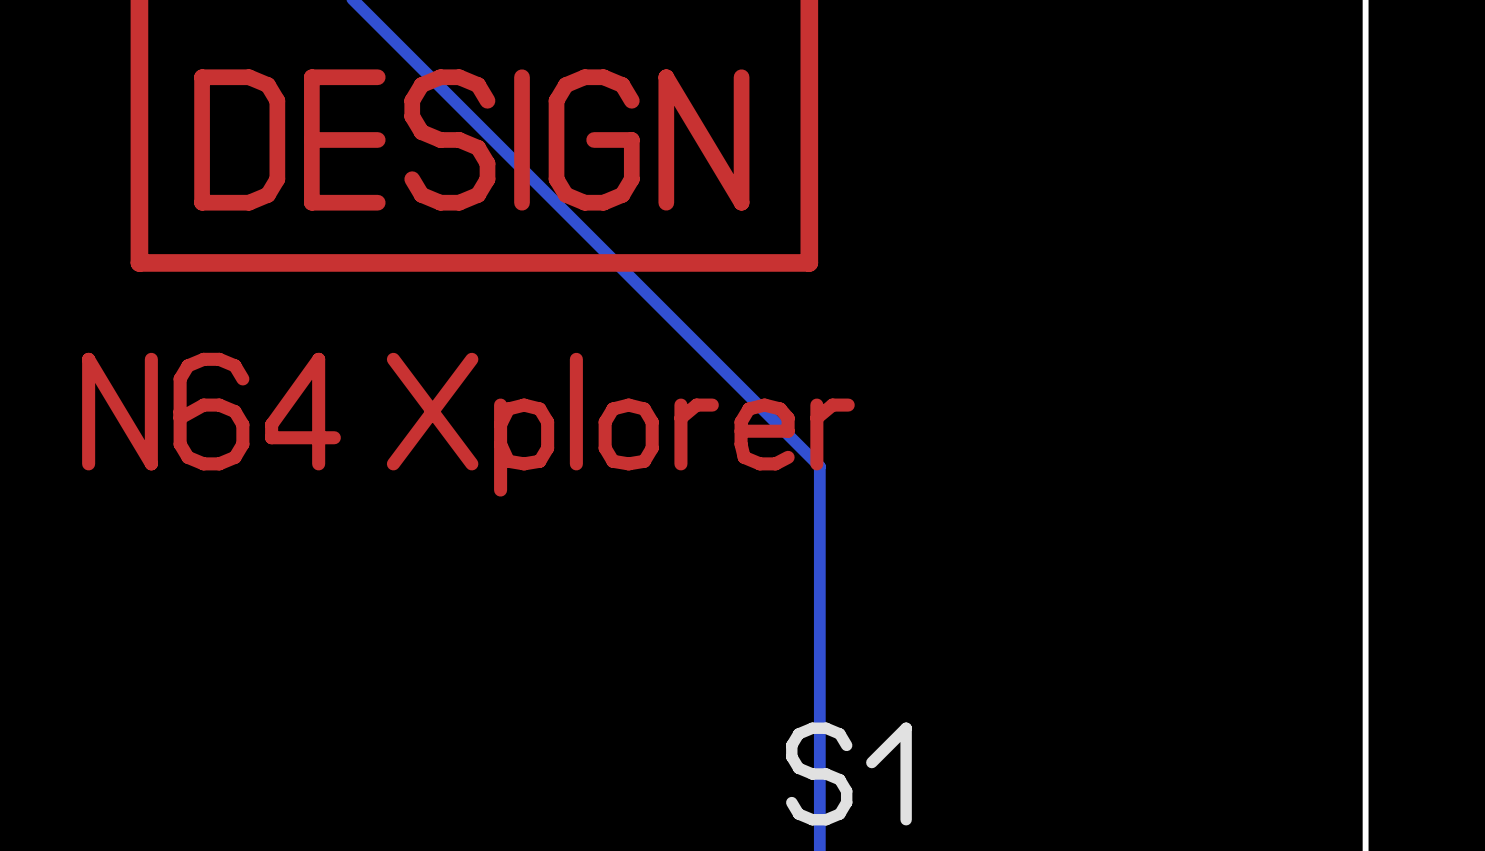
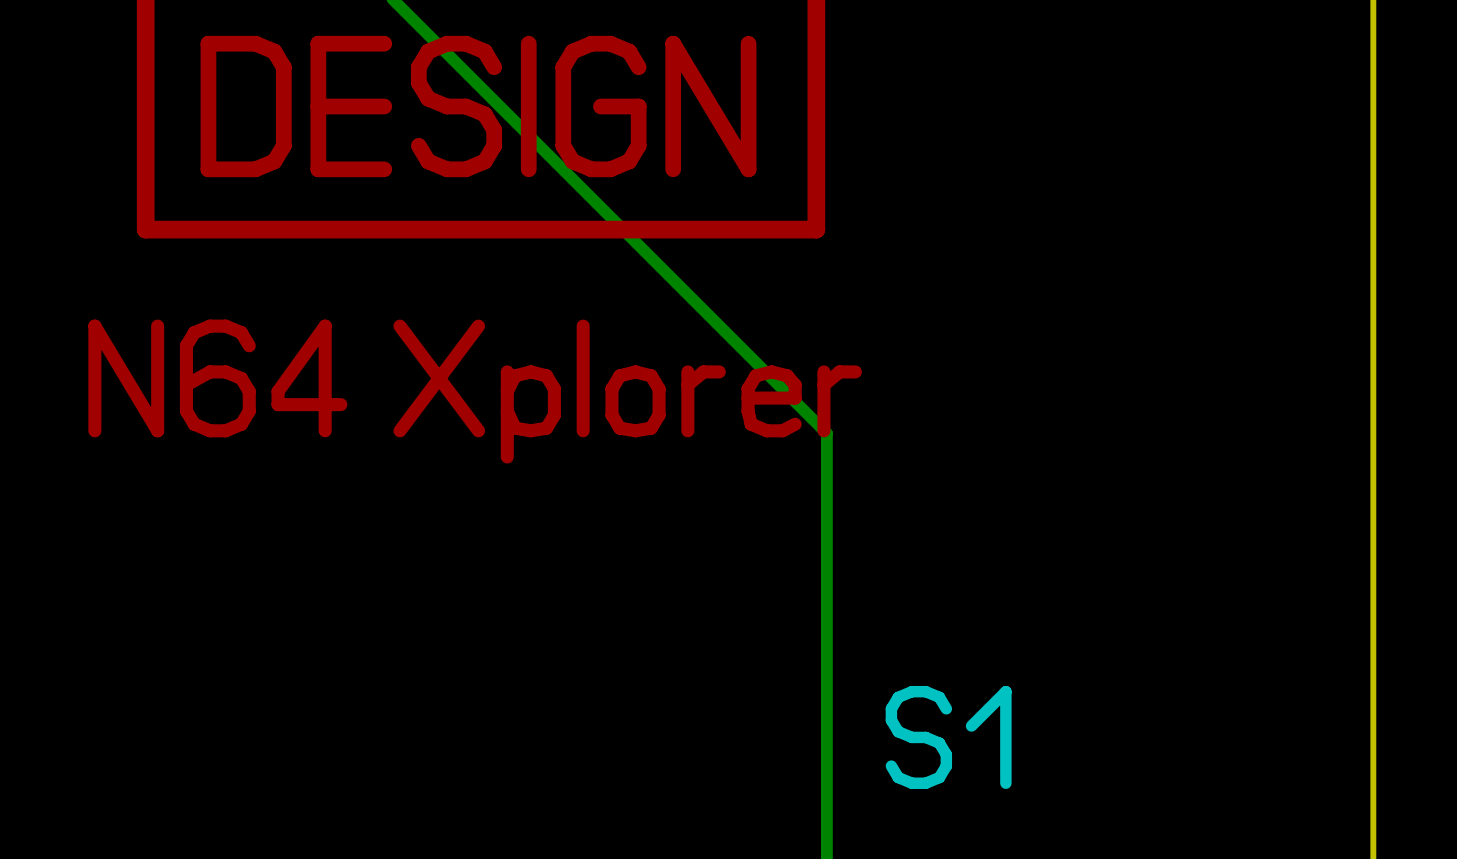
line: (846, 745) (839, 733) (826, 728) (812, 728) (798, 733) (791, 745) (791, 756) (798, 768) (812, 773) (826, 773) (839, 779) (846, 791) (846, 802) (839, 814) (826, 819) (812, 819) (798, 814) (791, 802) -> (946, 708) (939, 697) (925, 691) (912, 691) (898, 697) (891, 708) (891, 720) (898, 731) (912, 737) (925, 737) (939, 743) (946, 754) (946, 766) (939, 777) (925, 783) (912, 783) (898, 777) (891, 766)
line: (871, 762) (906, 728) (906, 819) -> (971, 726) (1005, 691) (1005, 783)

